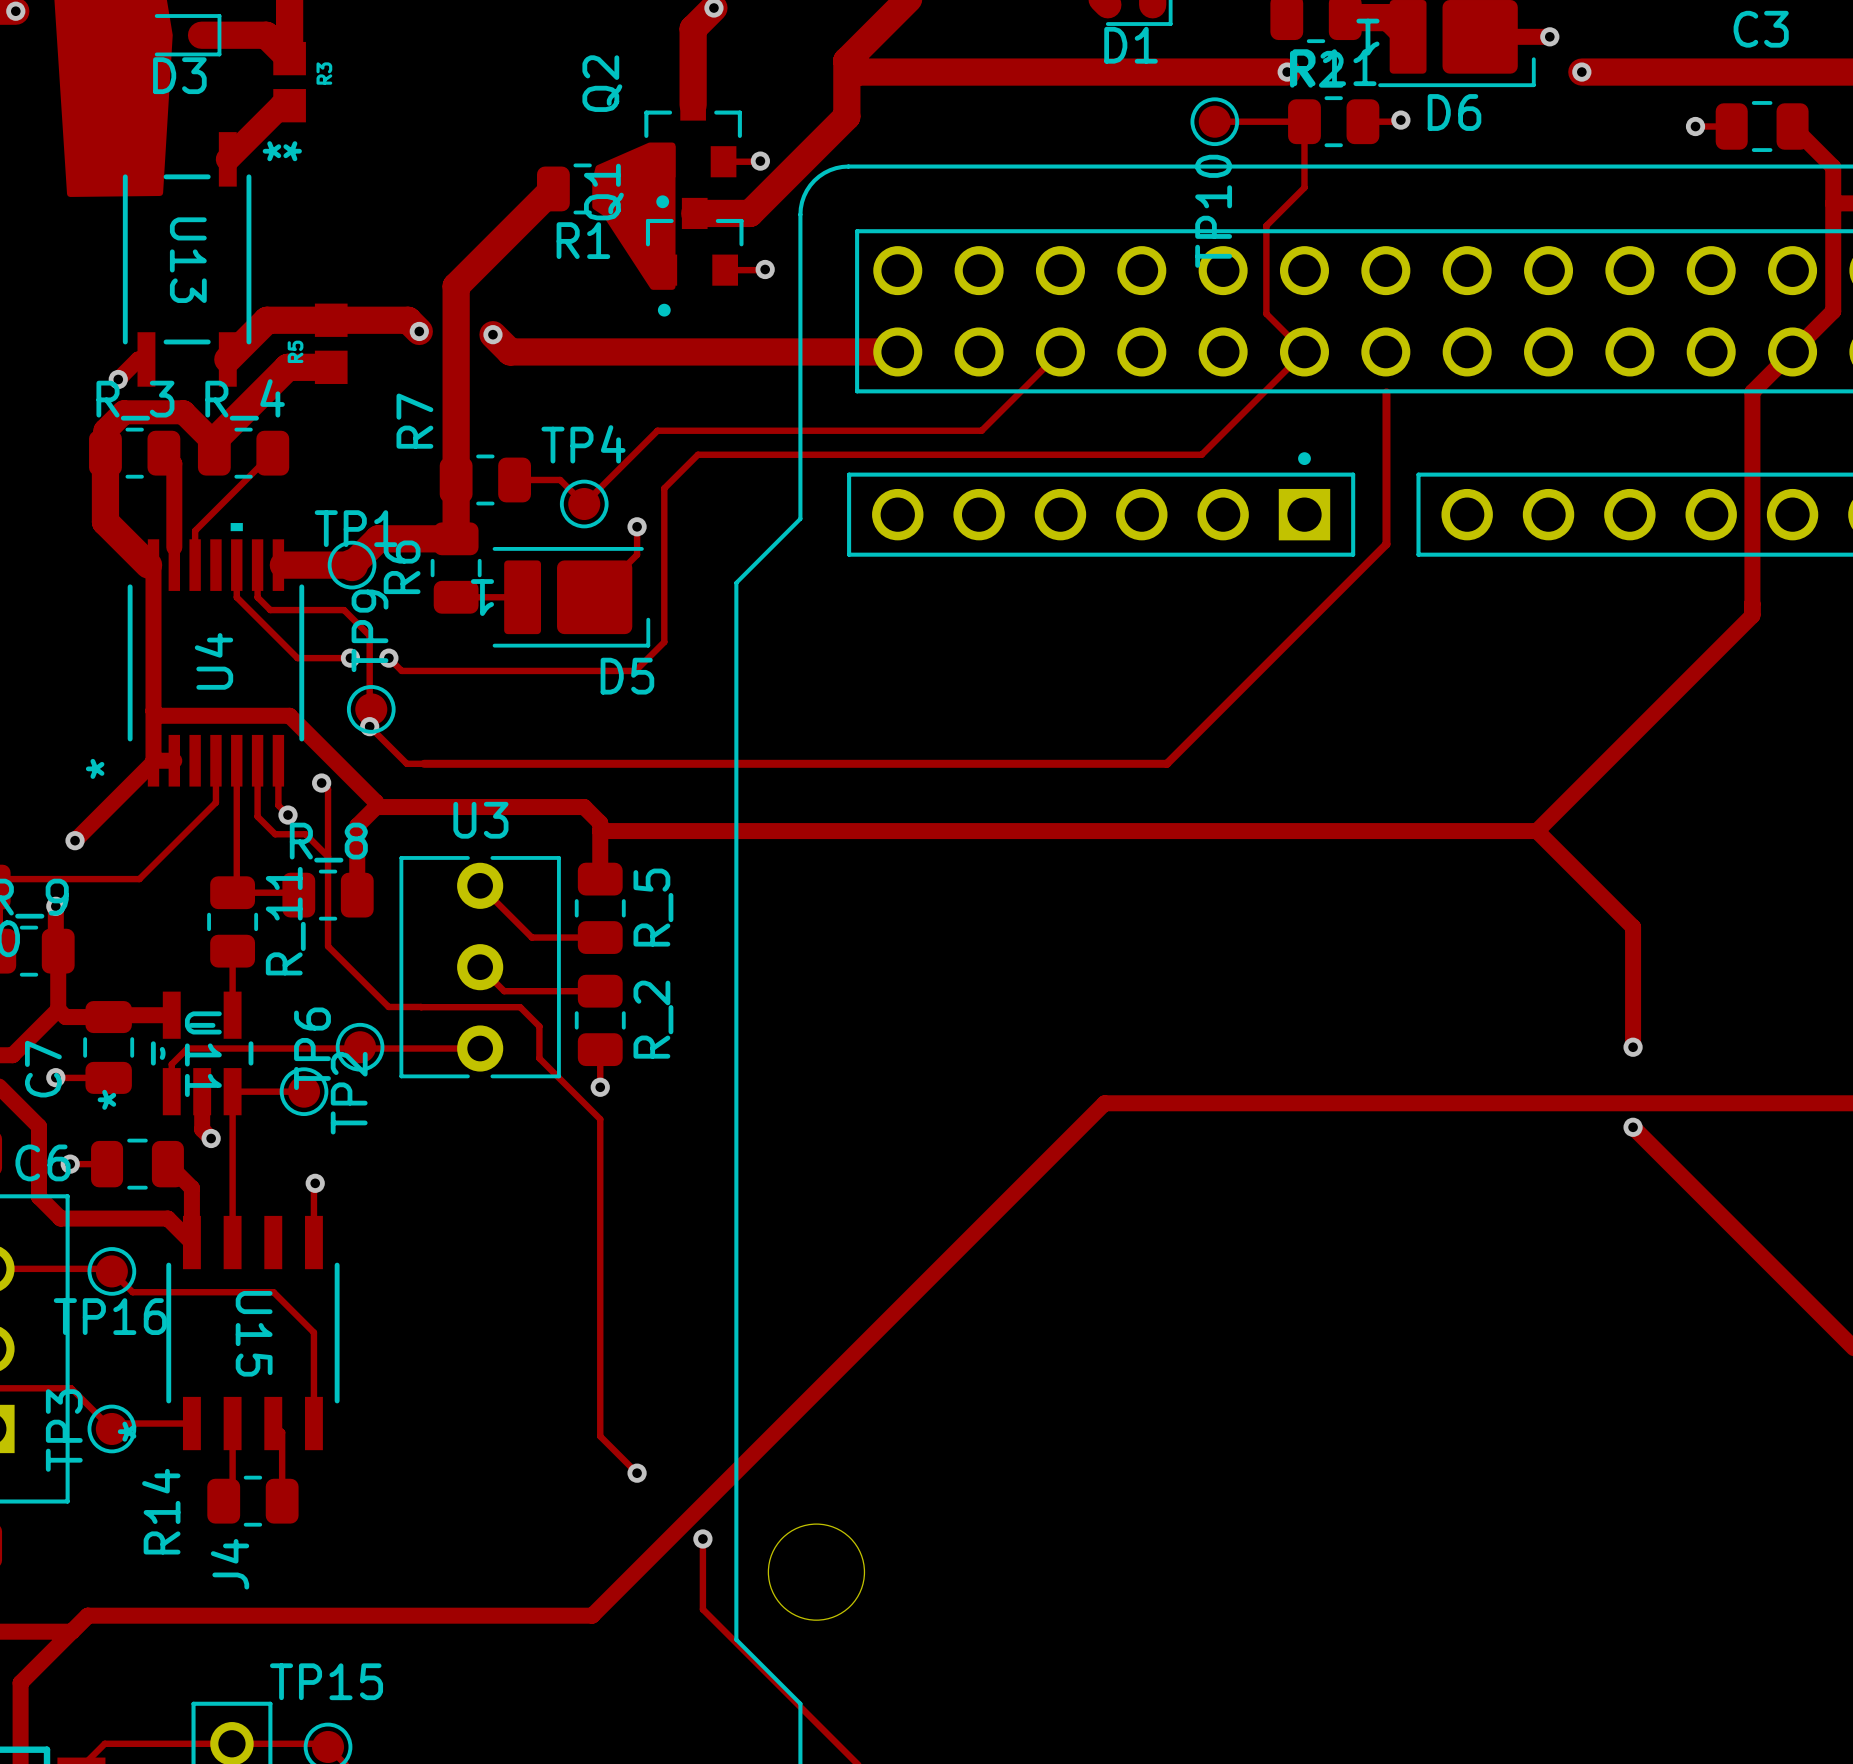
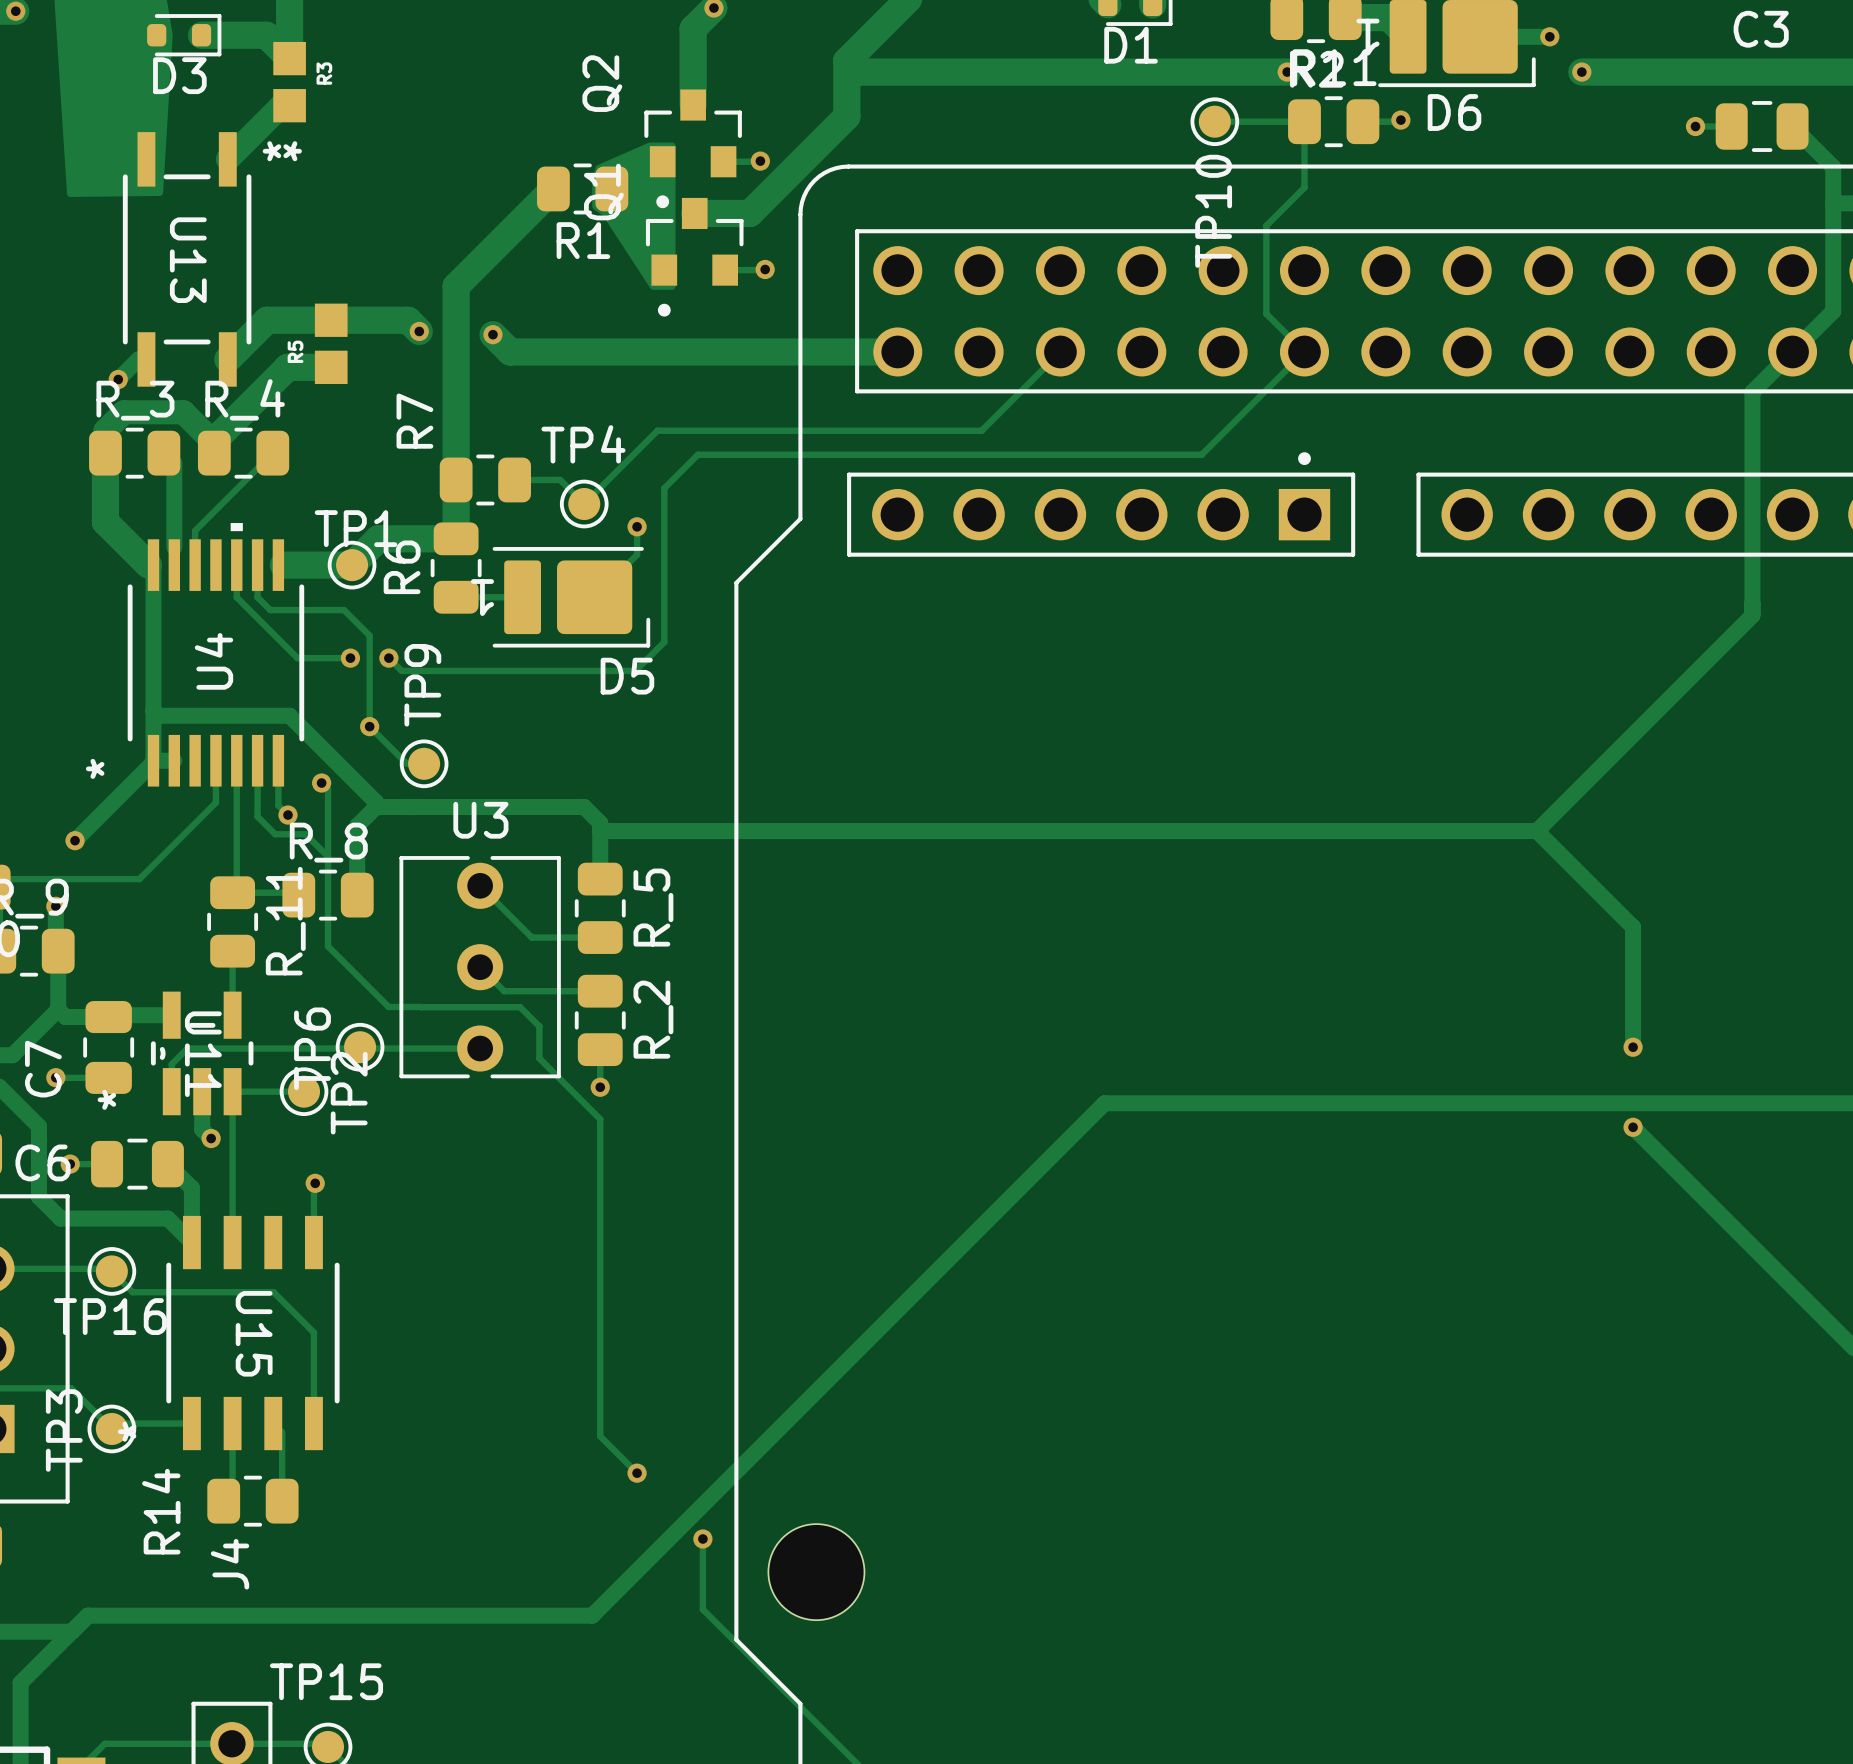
track: (1386, 392) (1386, 544) (1166, 763) (424, 763) -> none
TP9 position: (371, 709) -> (424, 763)

